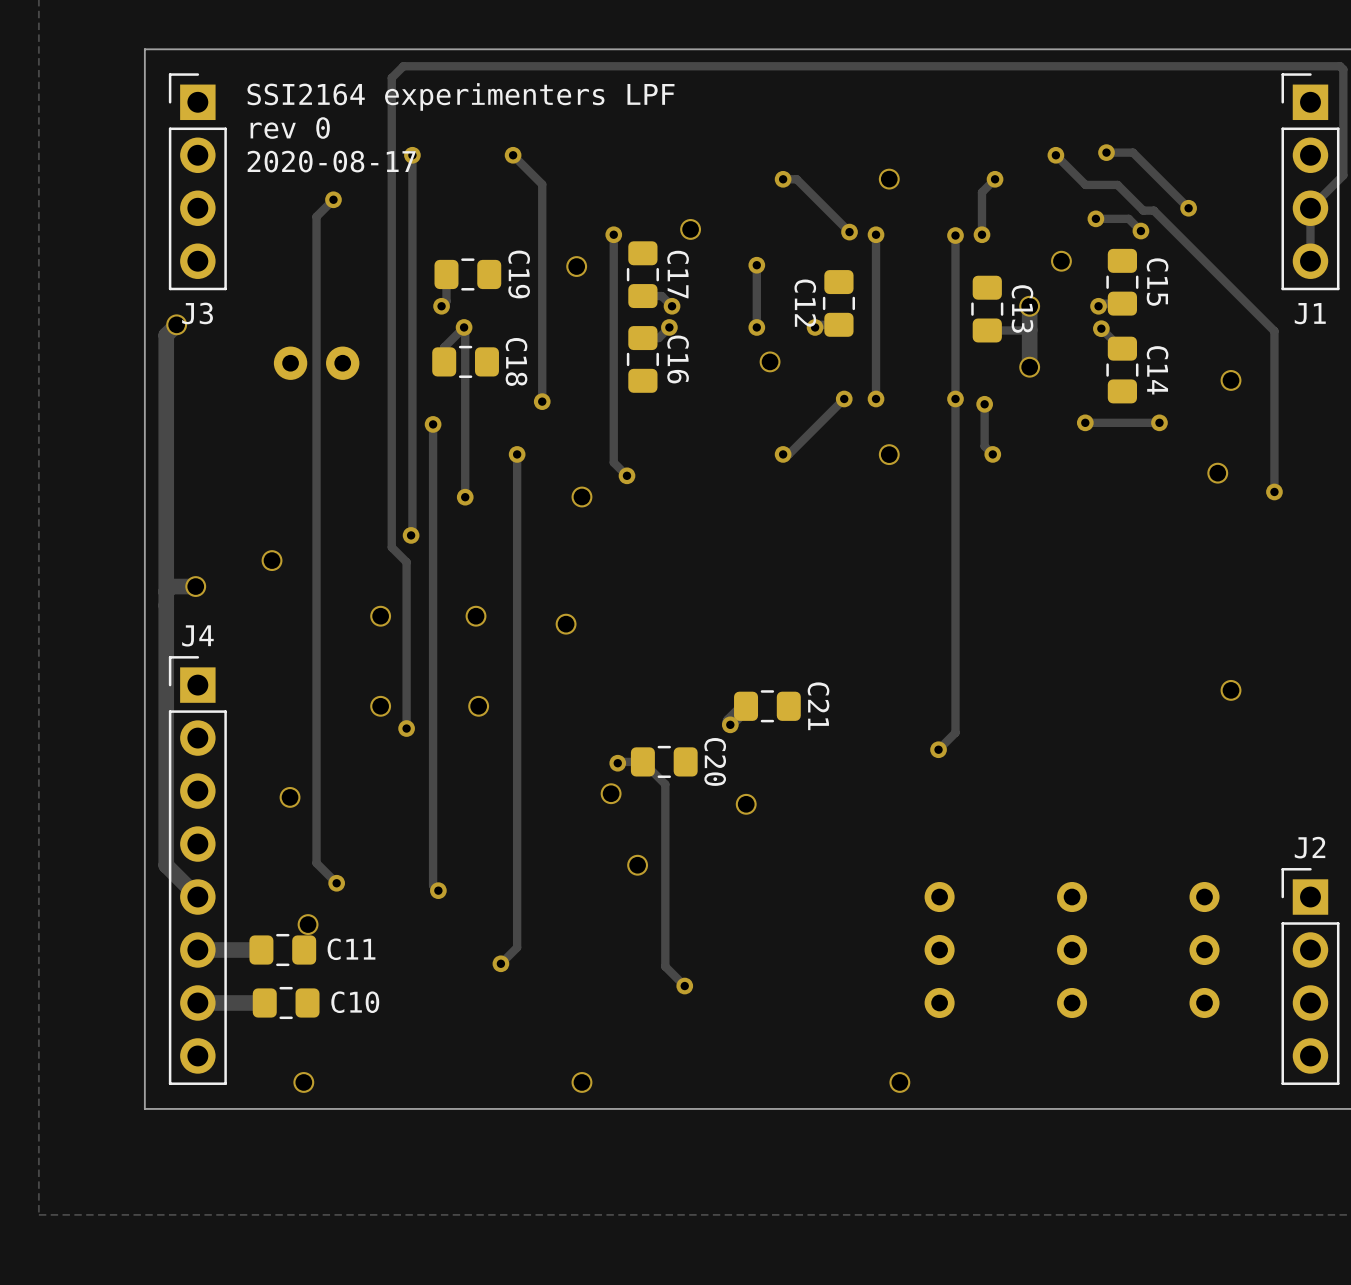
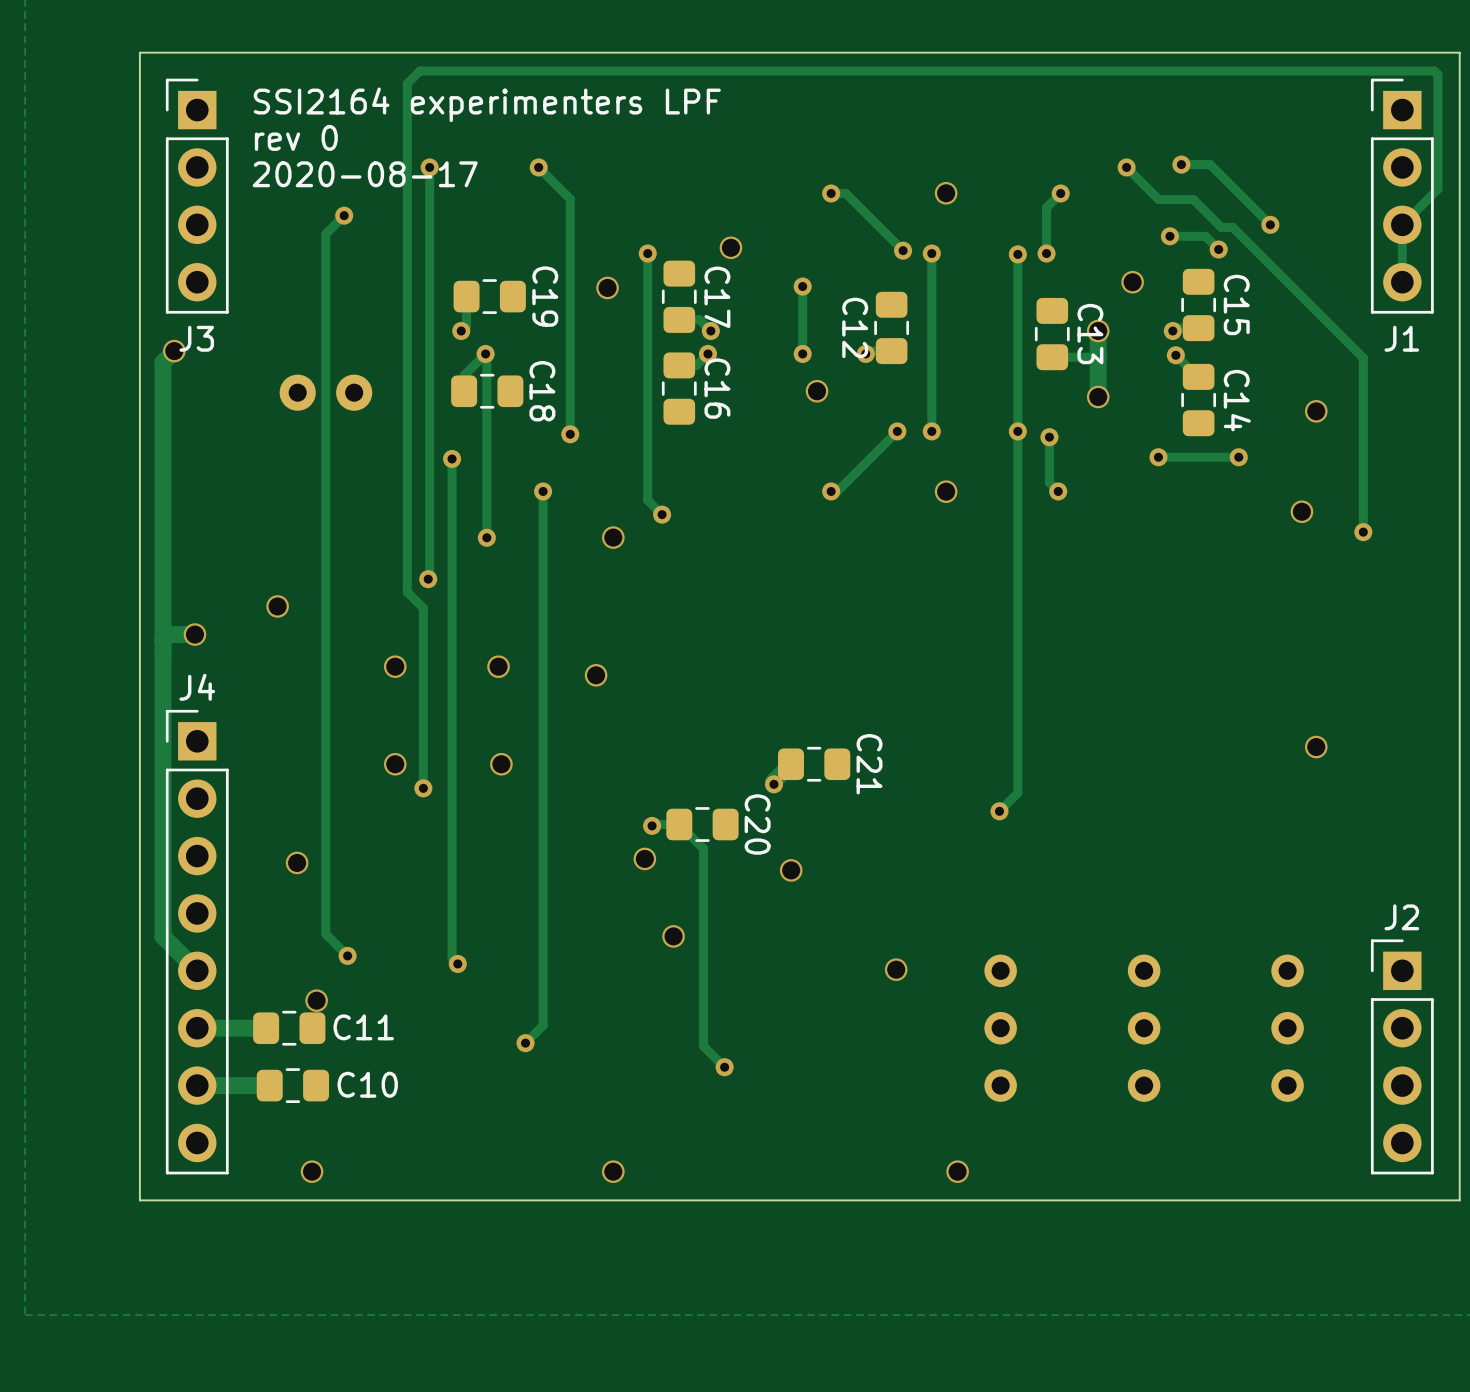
via: none -> (896, 969)

